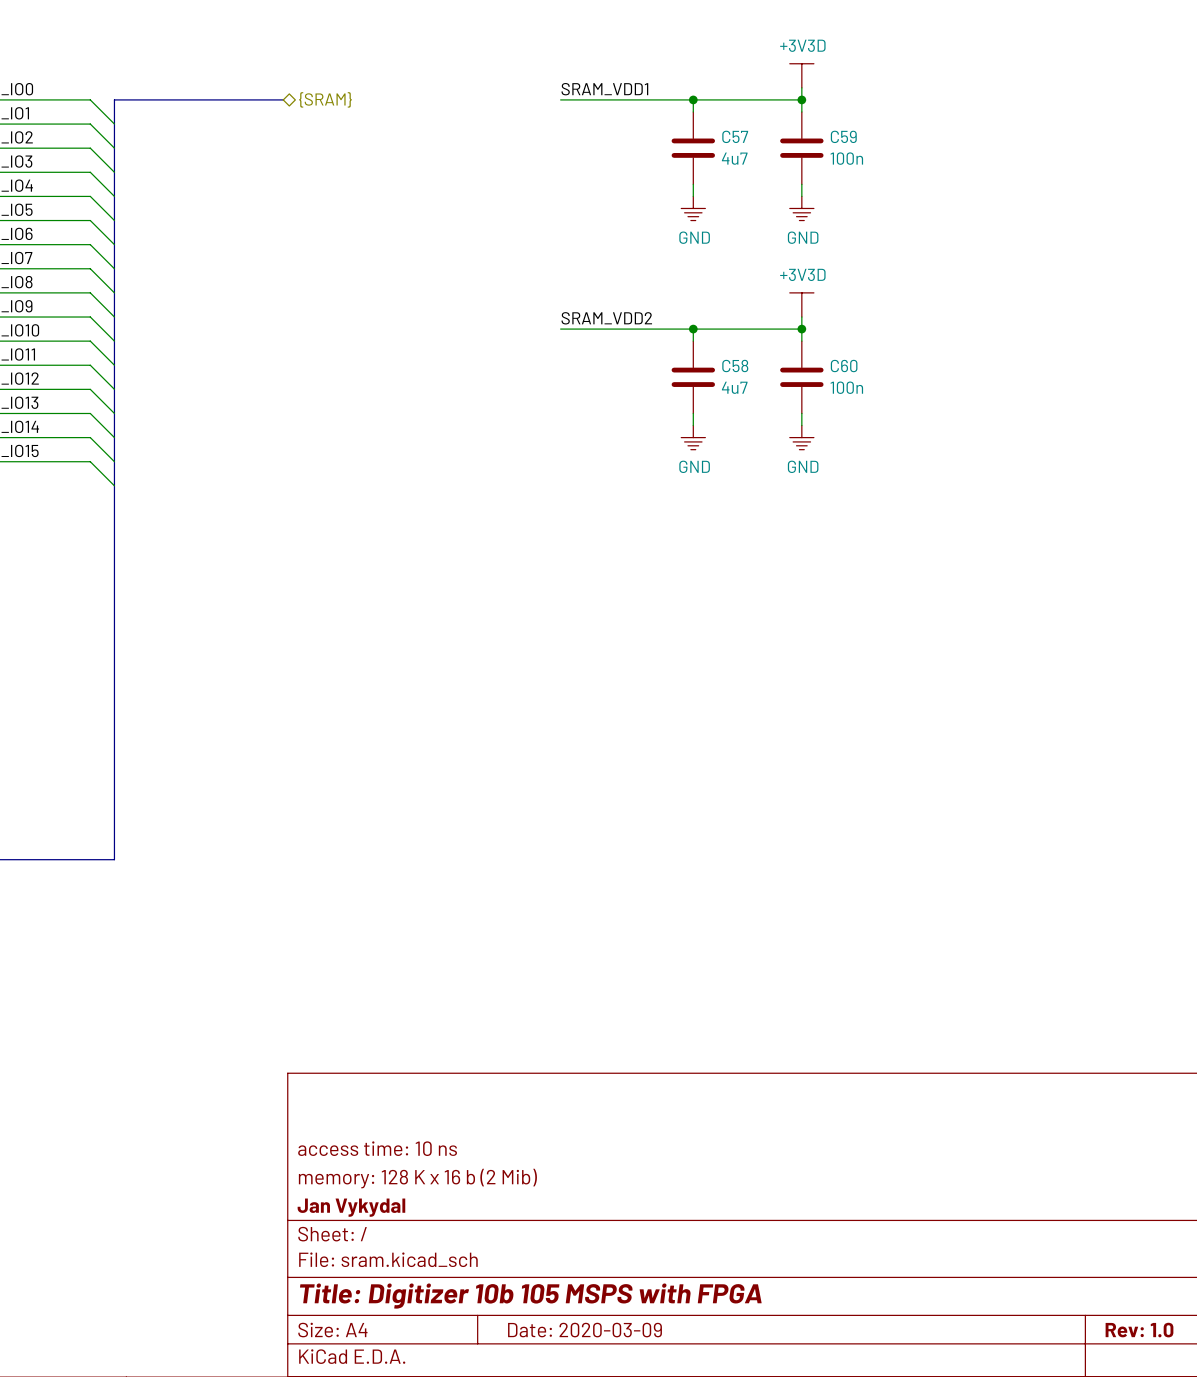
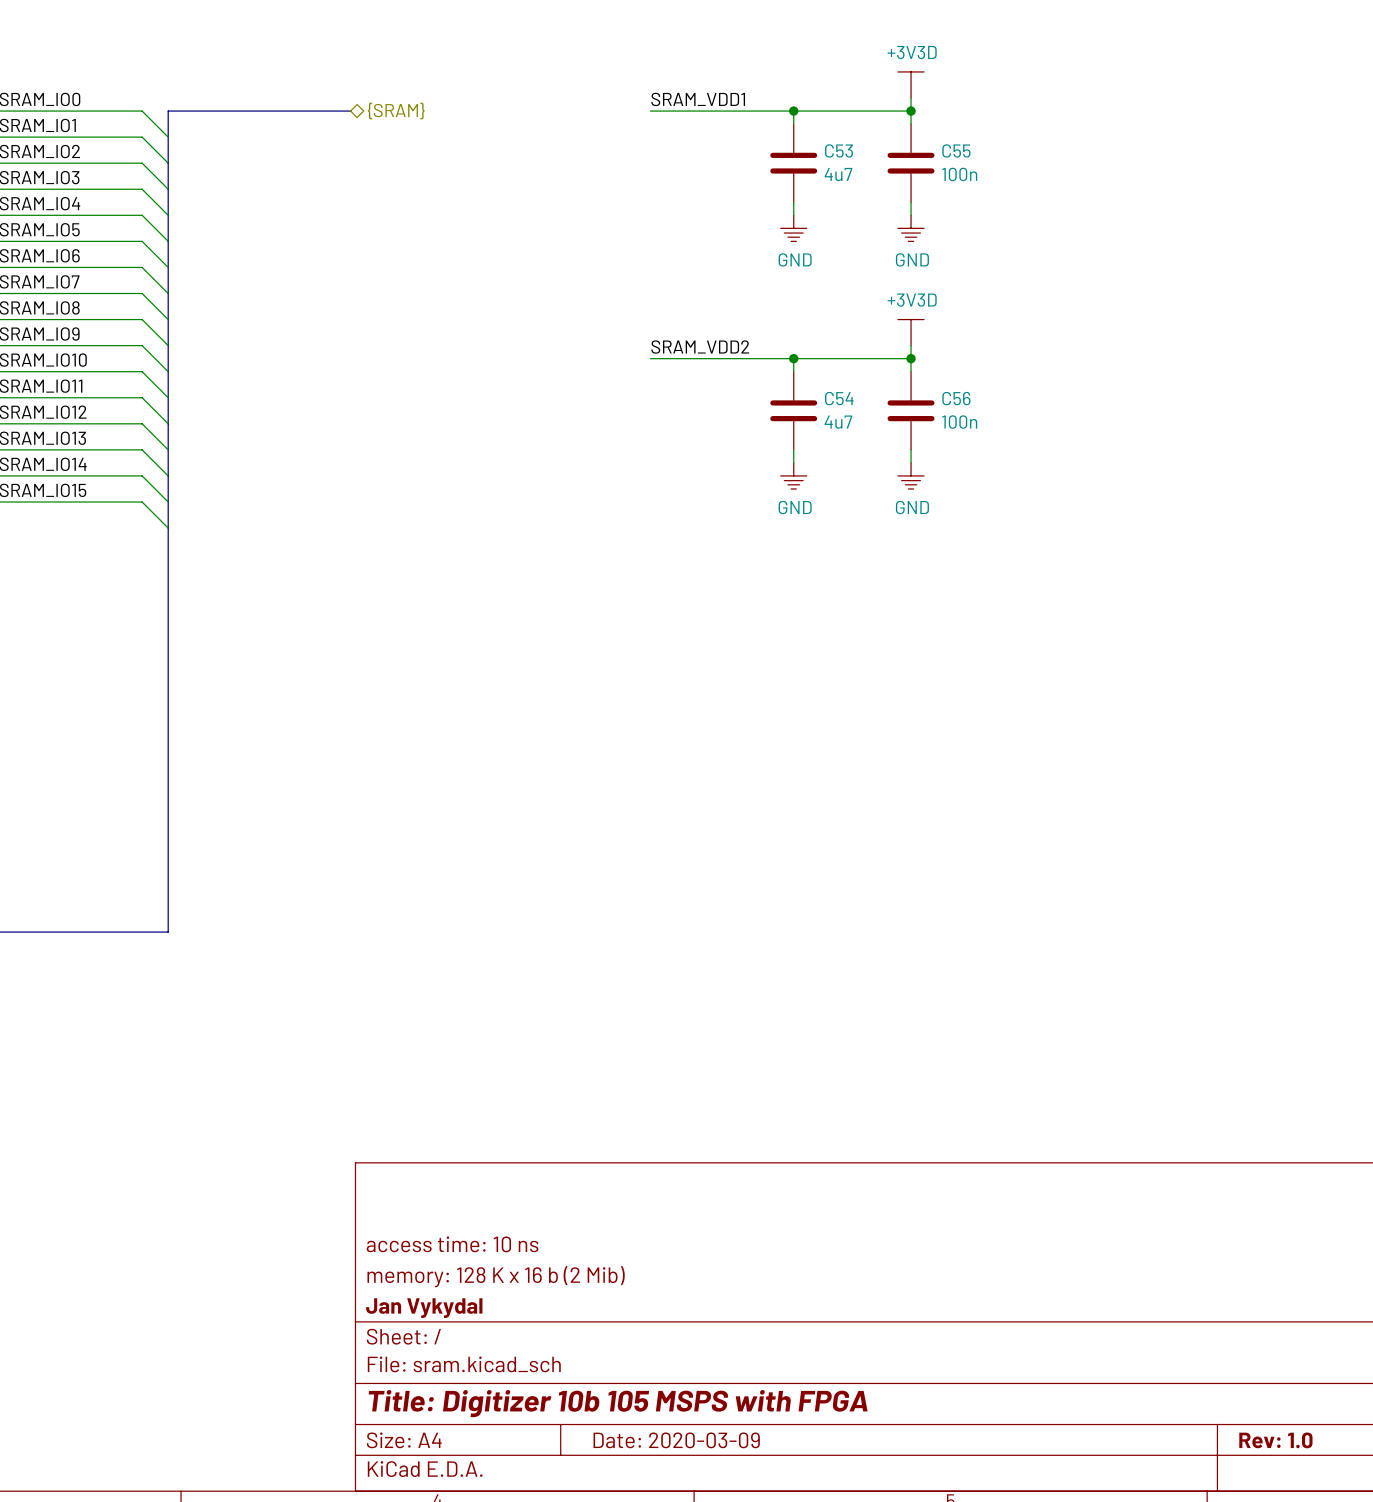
C57 name: C57 (735, 136) -> C53 (839, 150)
C59 name: C59 (843, 136) -> C55 (956, 150)
C58 name: C58 (735, 365) -> C54 (839, 398)
C60 name: C60 (844, 366) -> C56 (956, 398)

